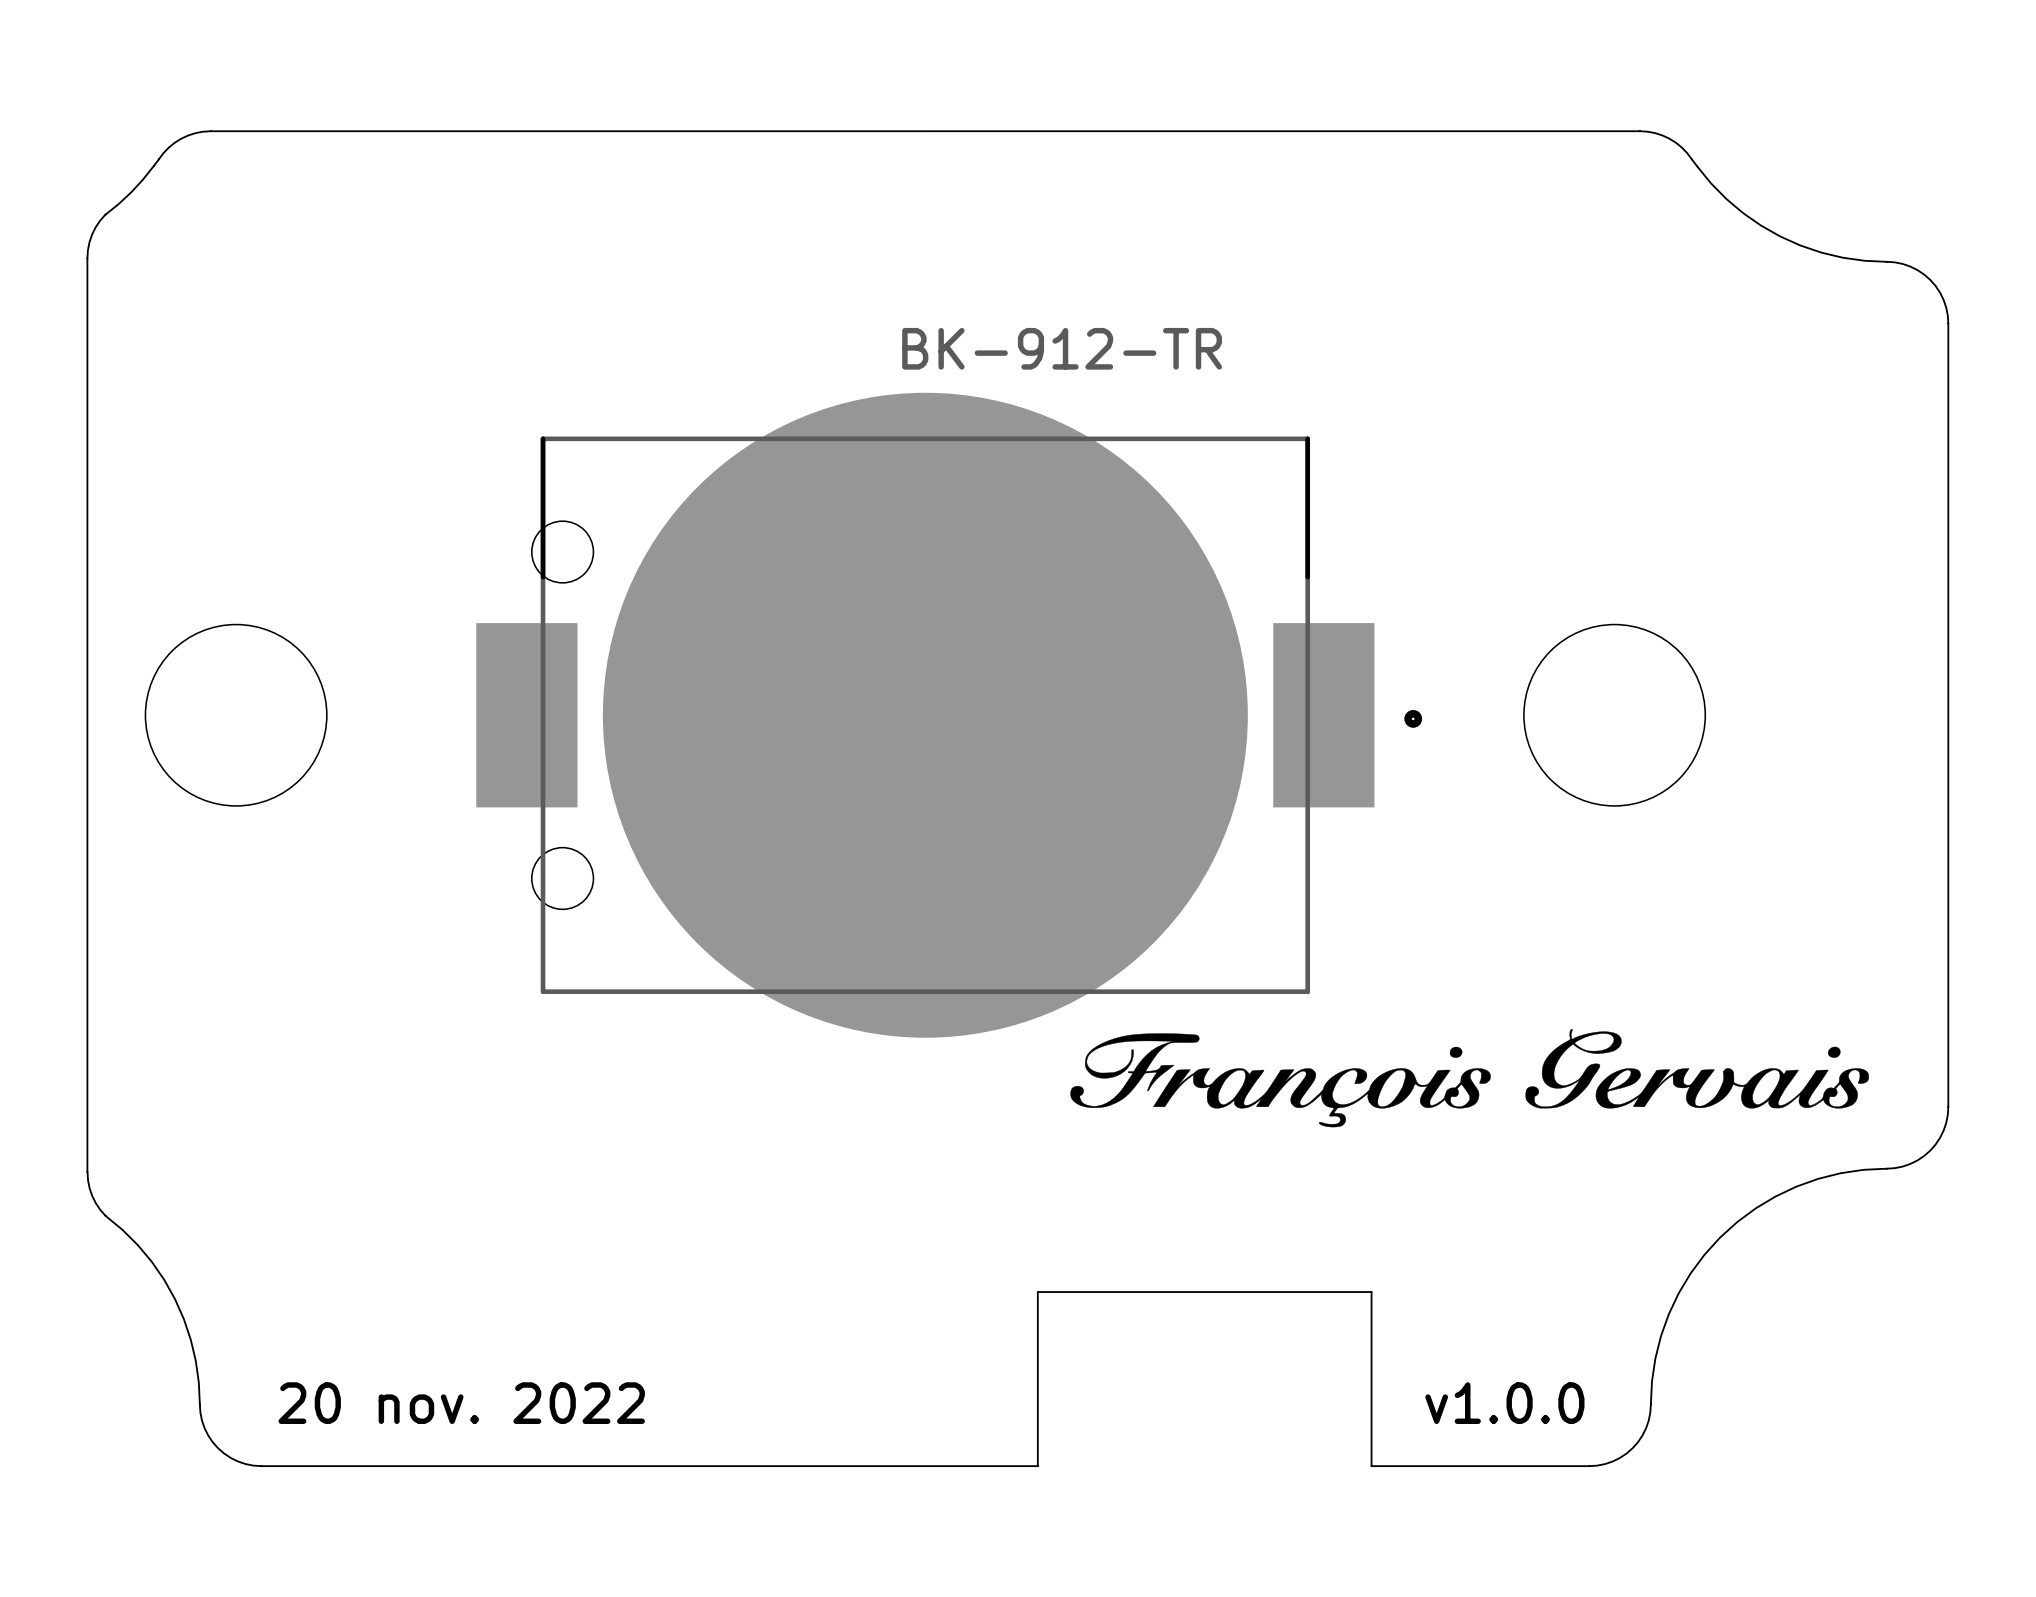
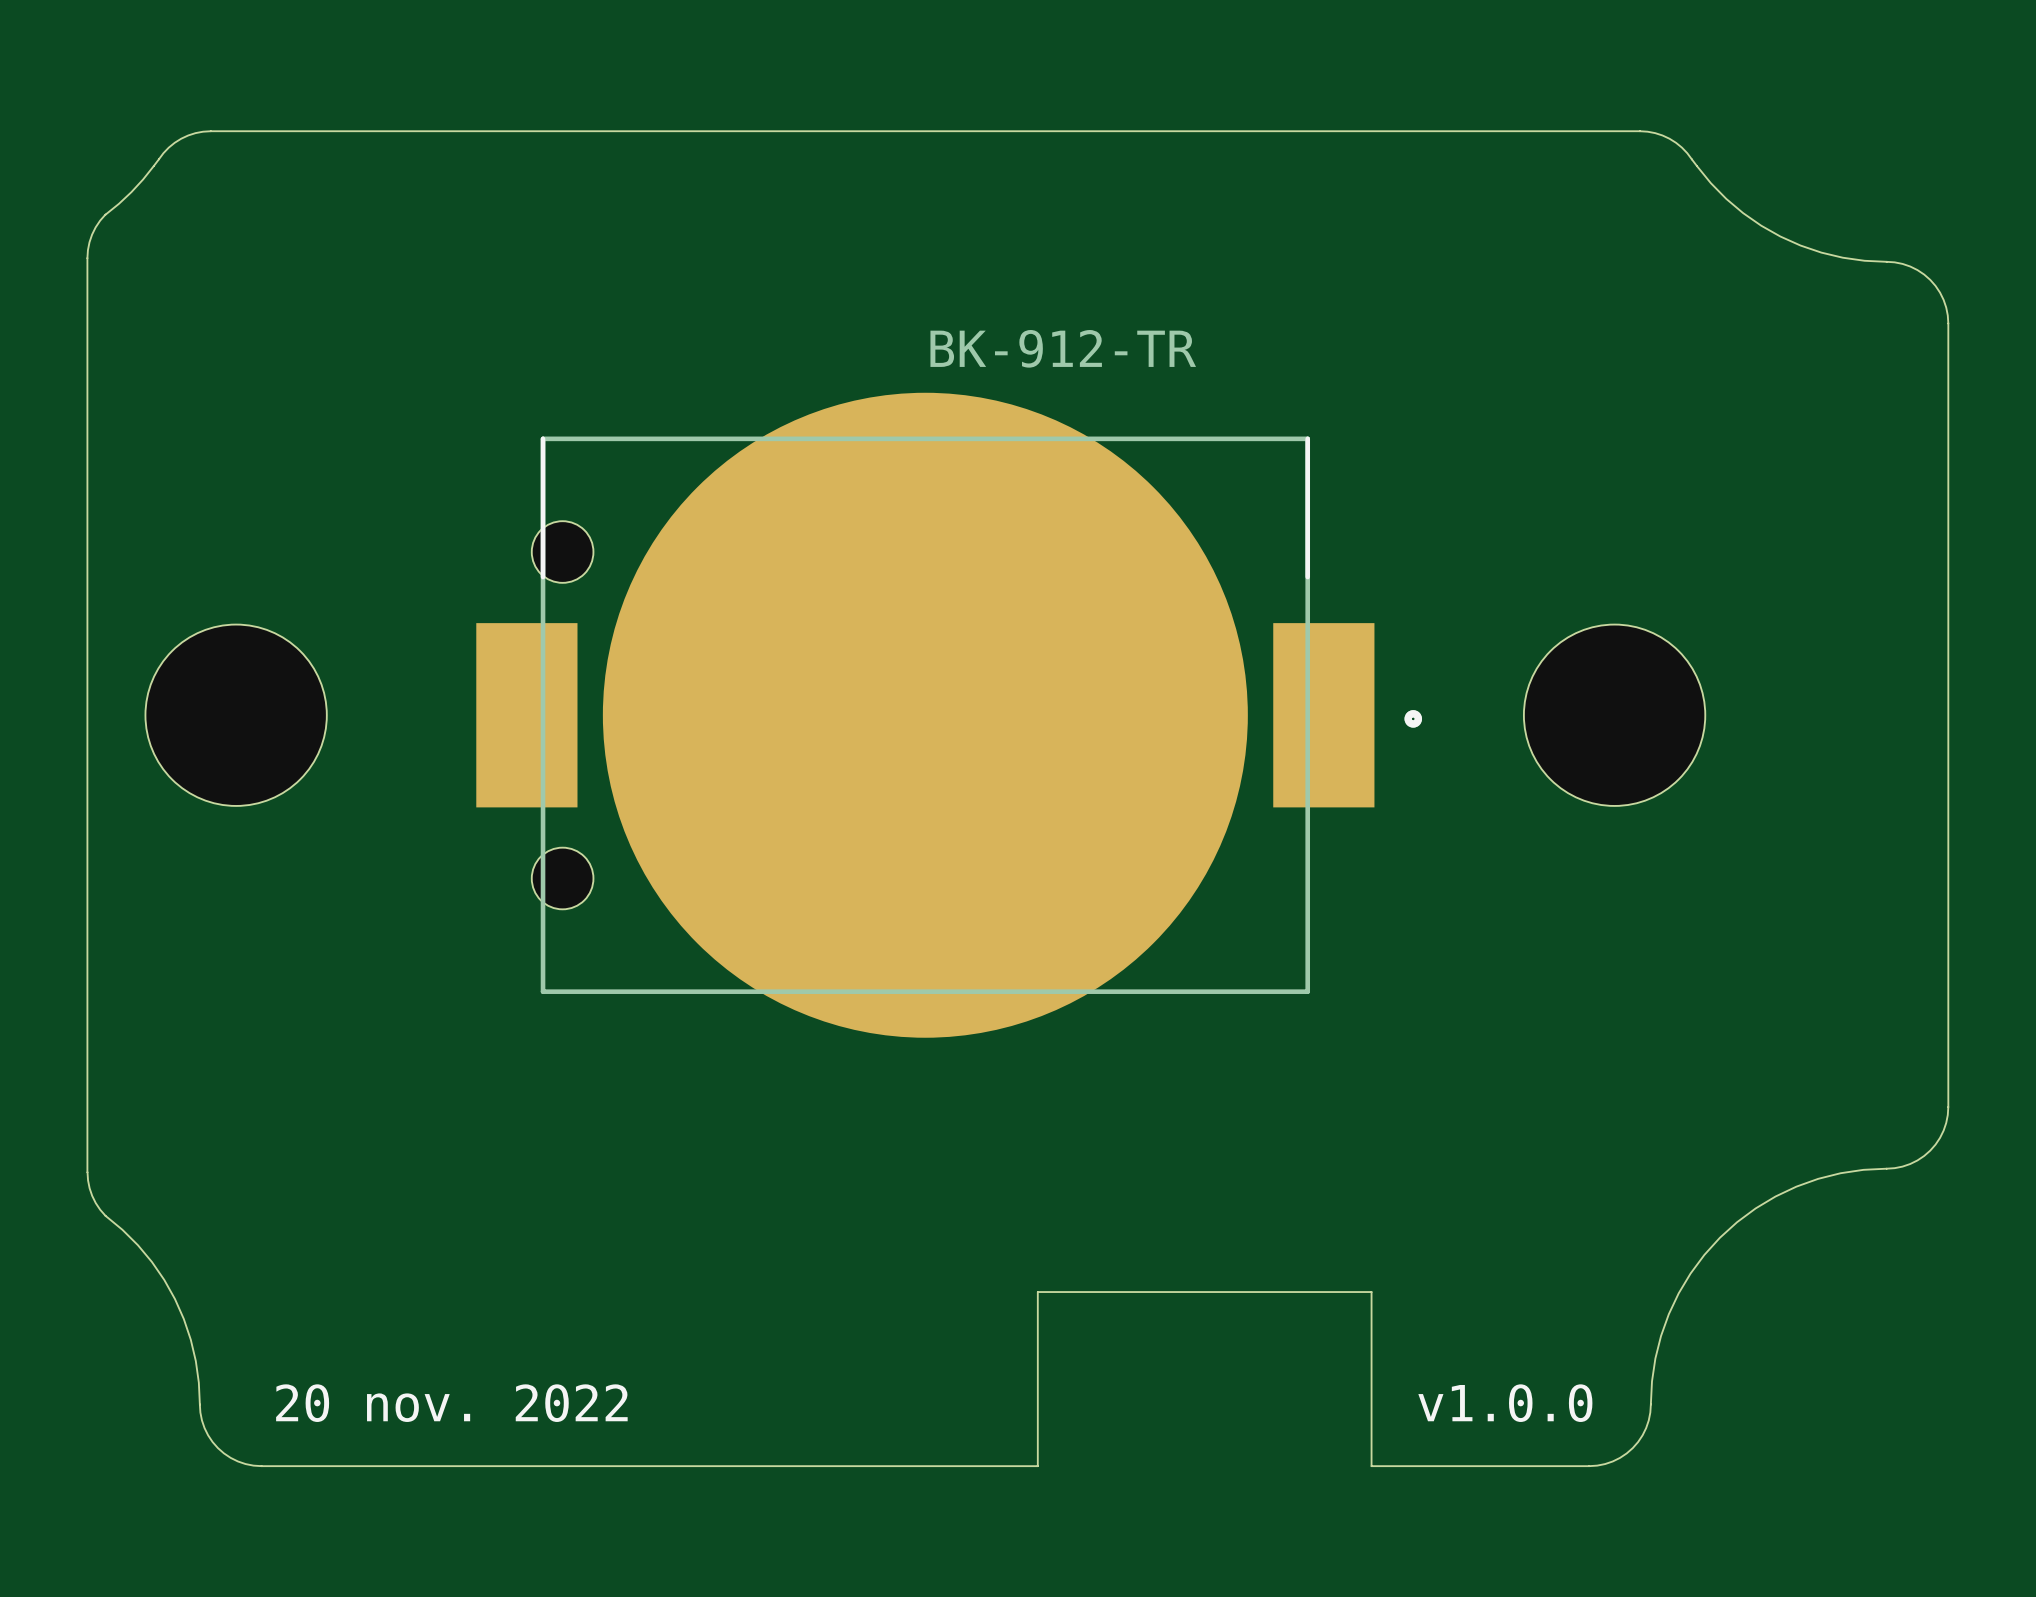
drawing: [1070, 1029, 1869, 1128] -> none

